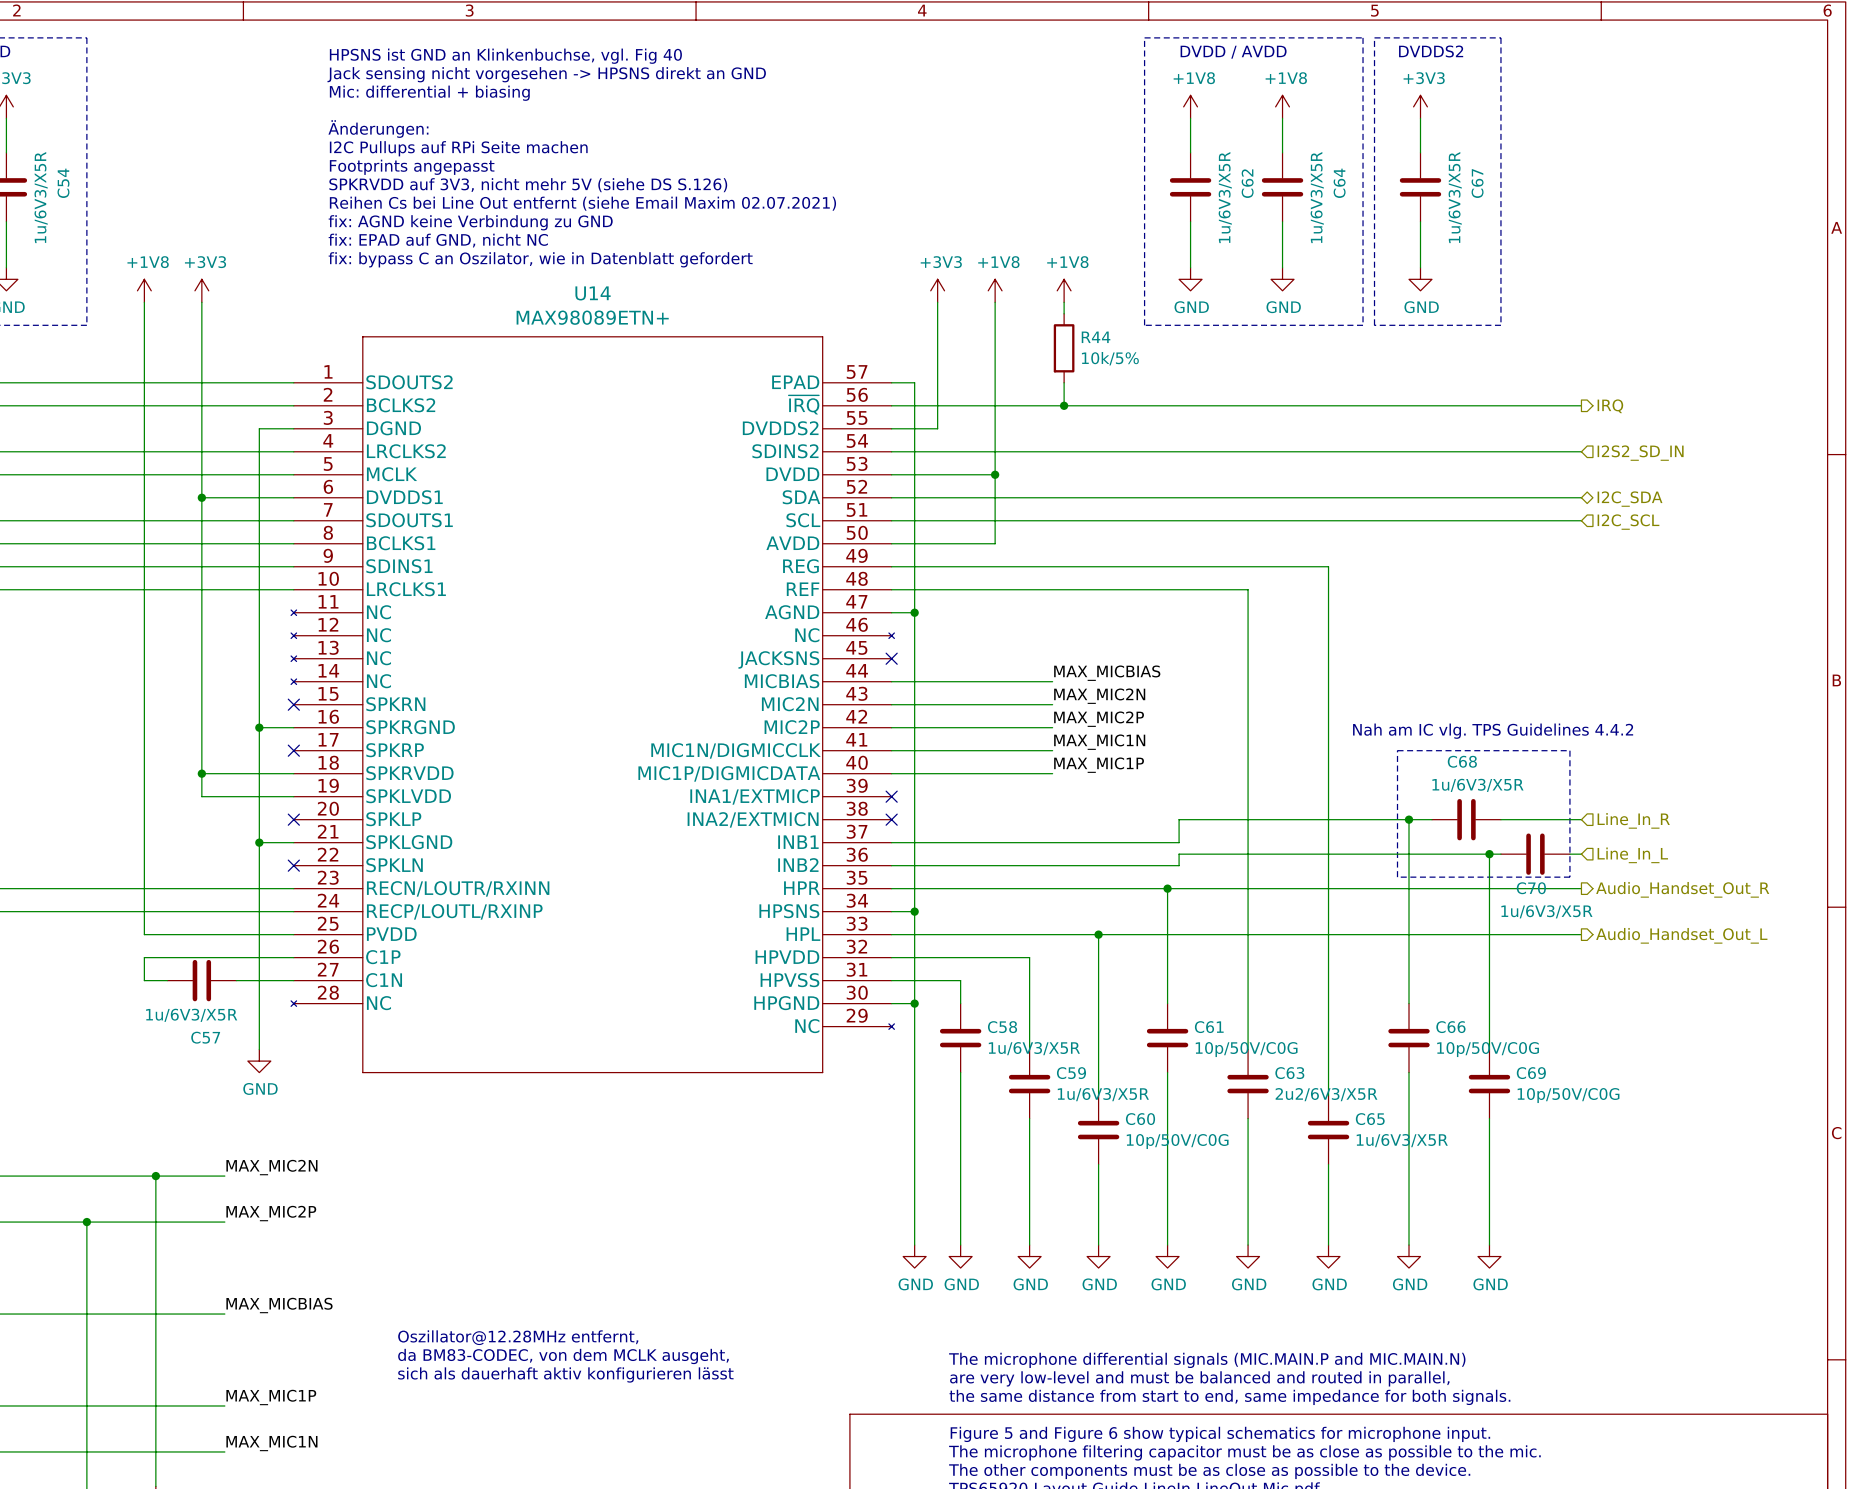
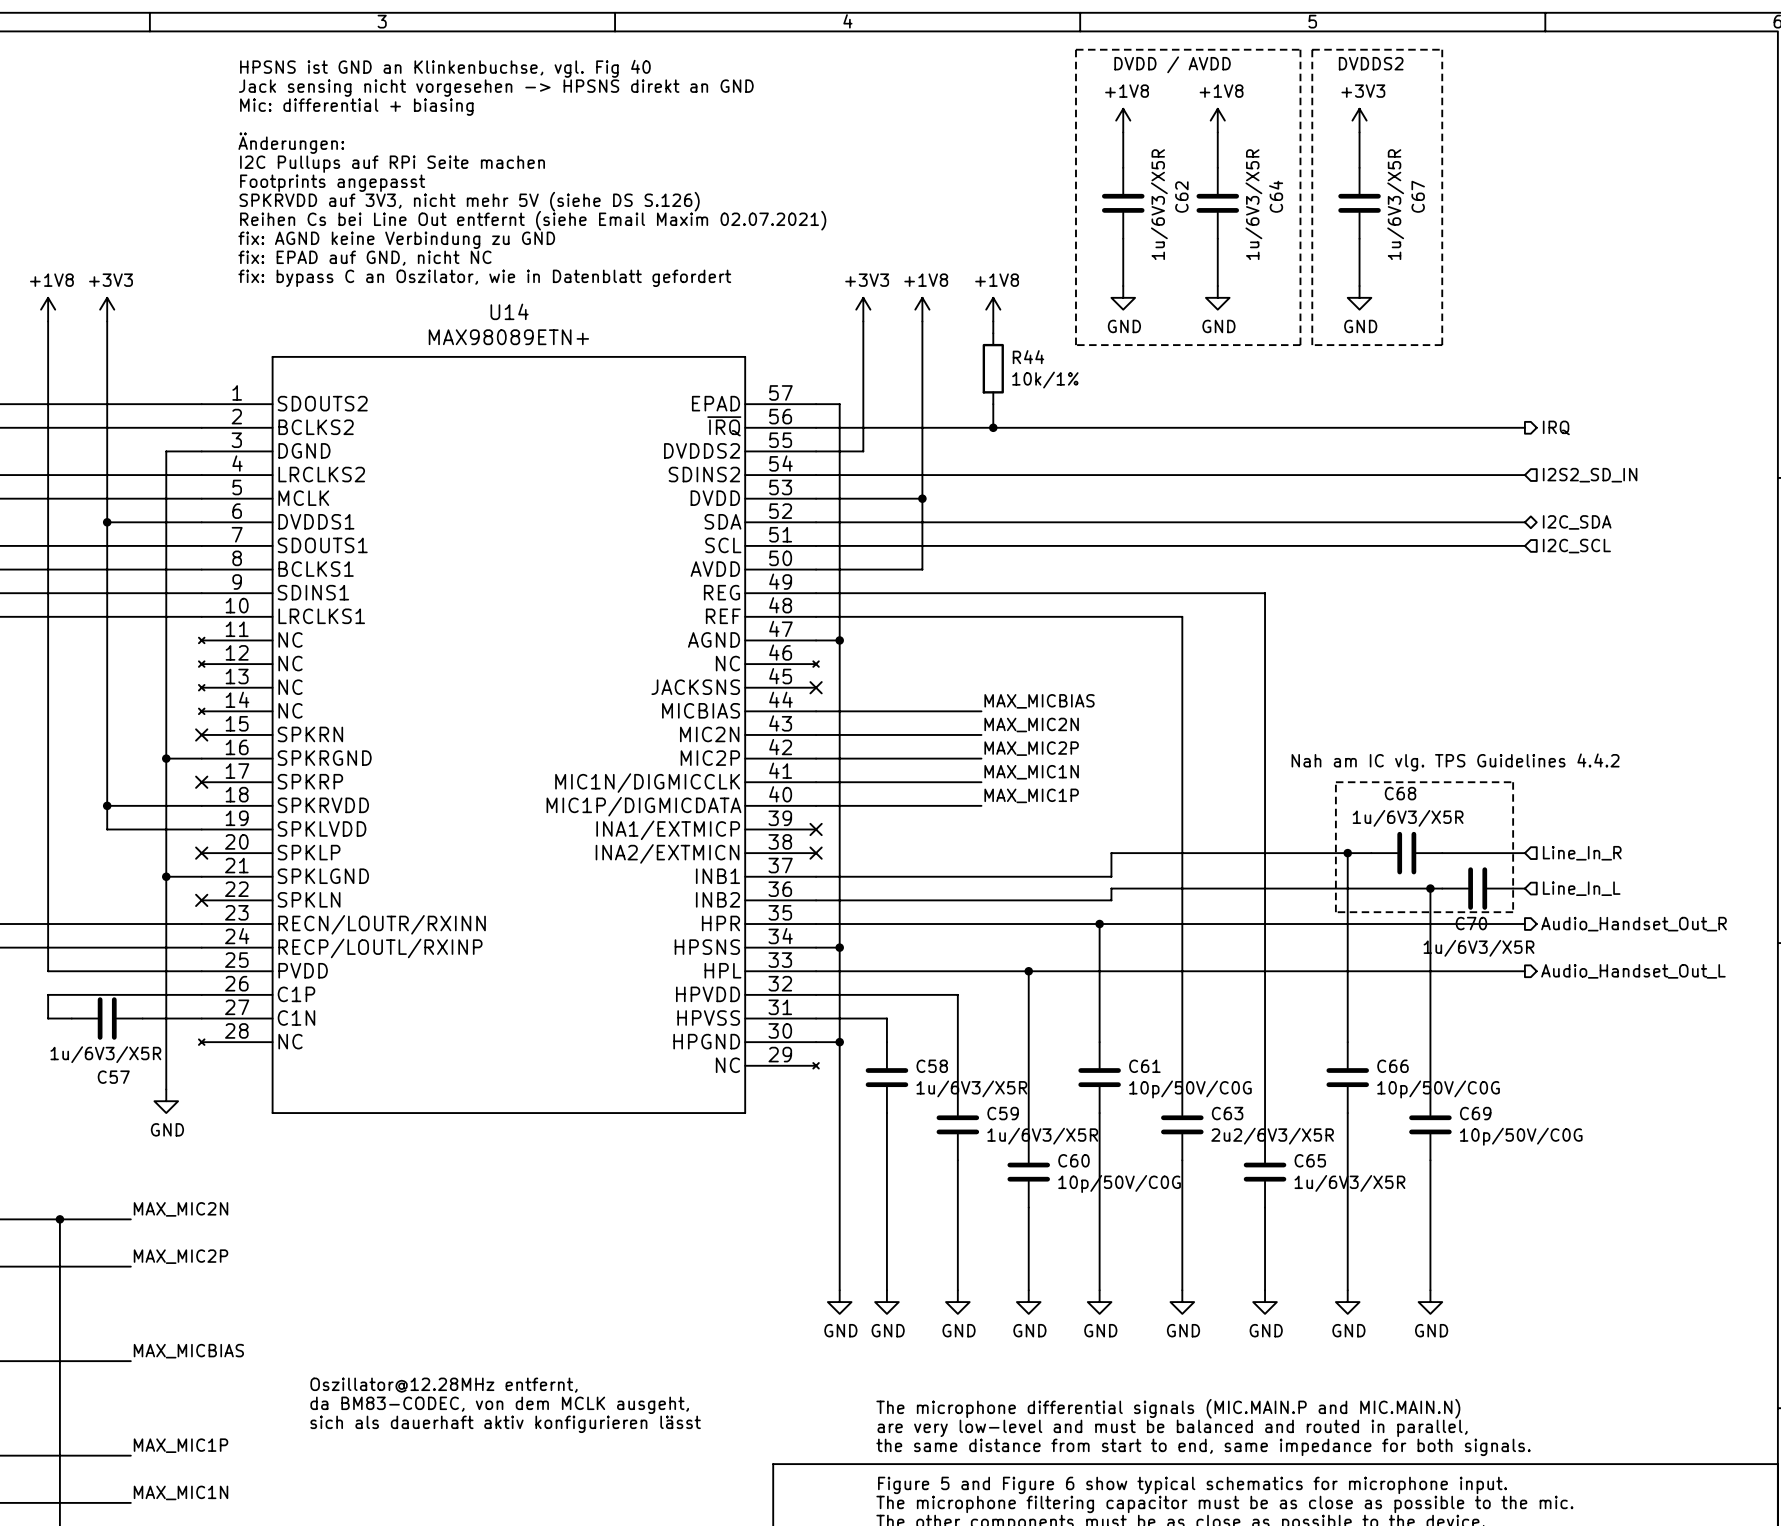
R44 value: 10k/5% (1110, 358) -> 10k/1% (1045, 380)

